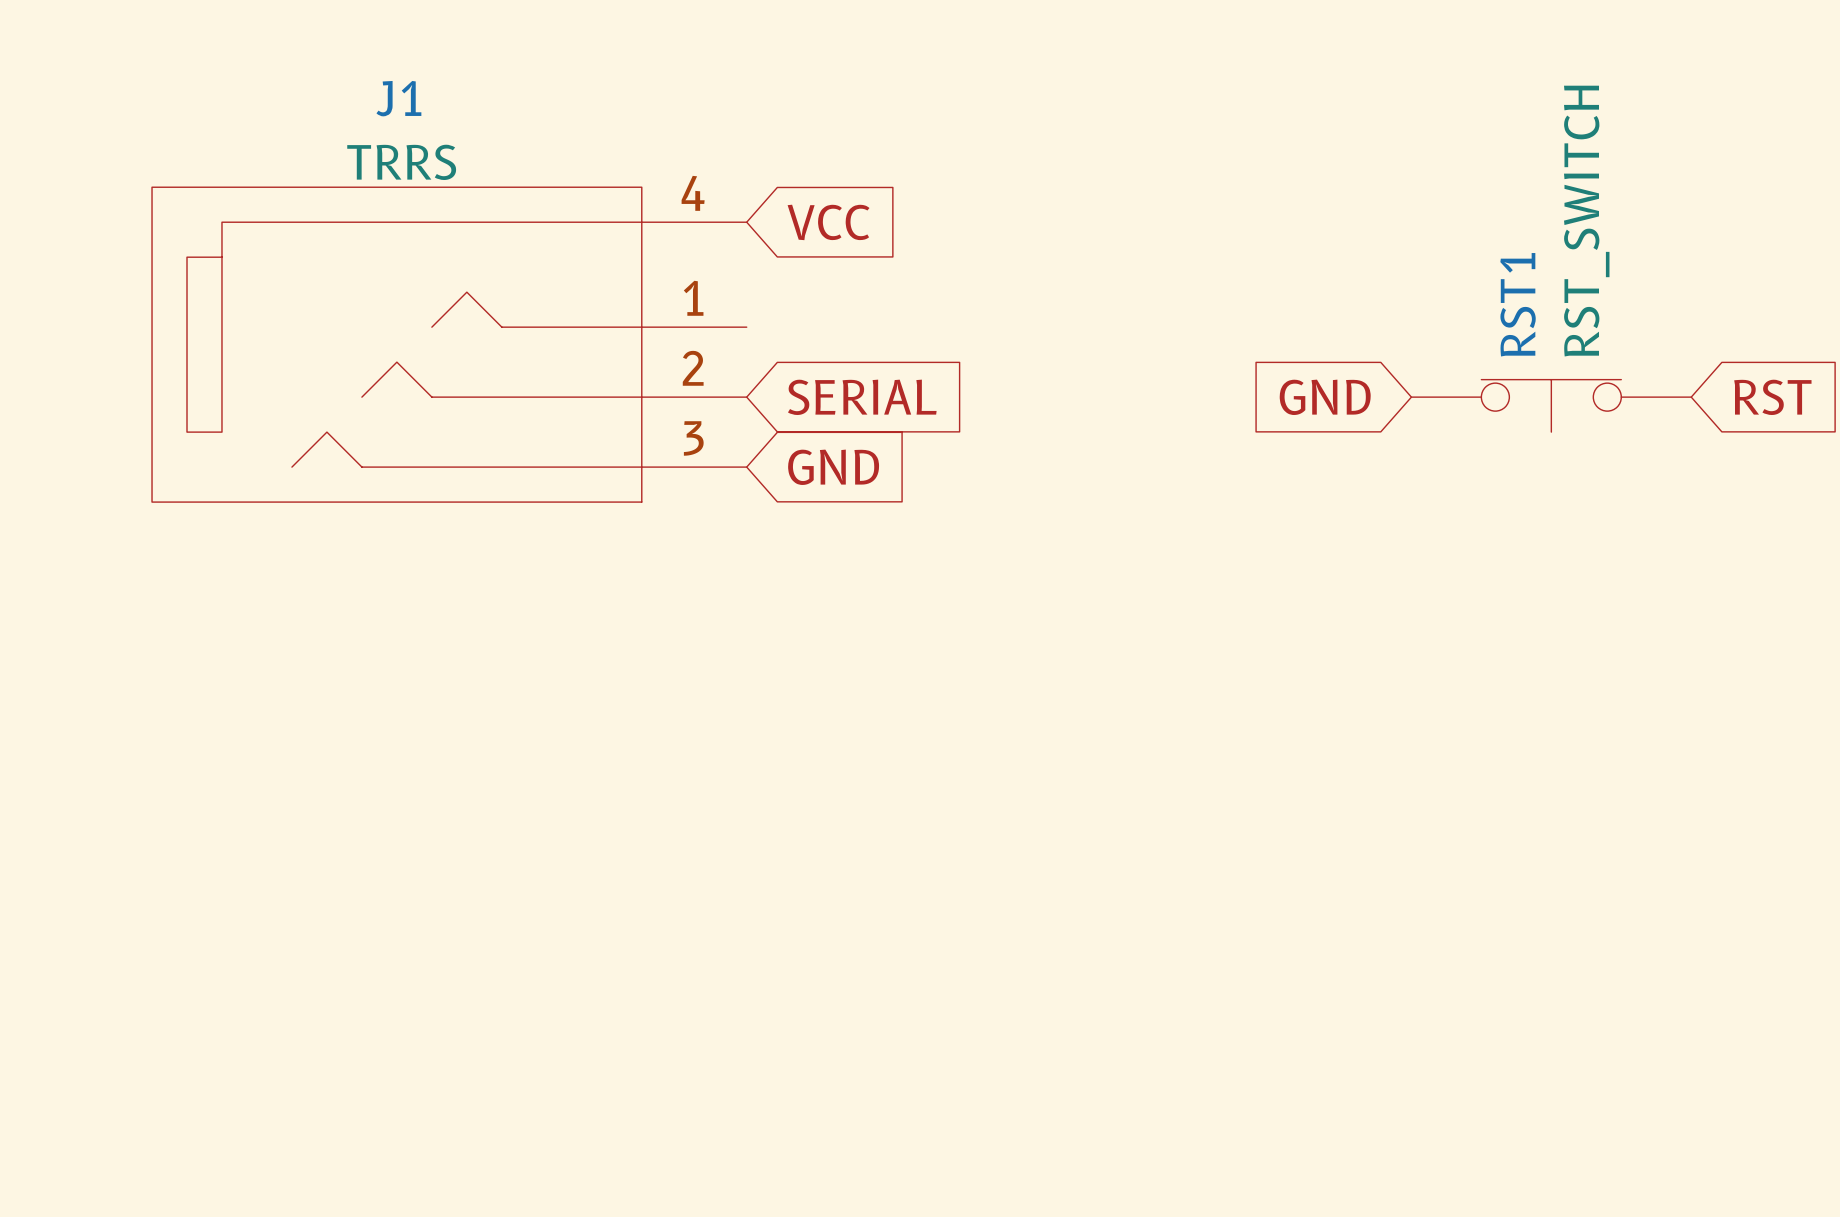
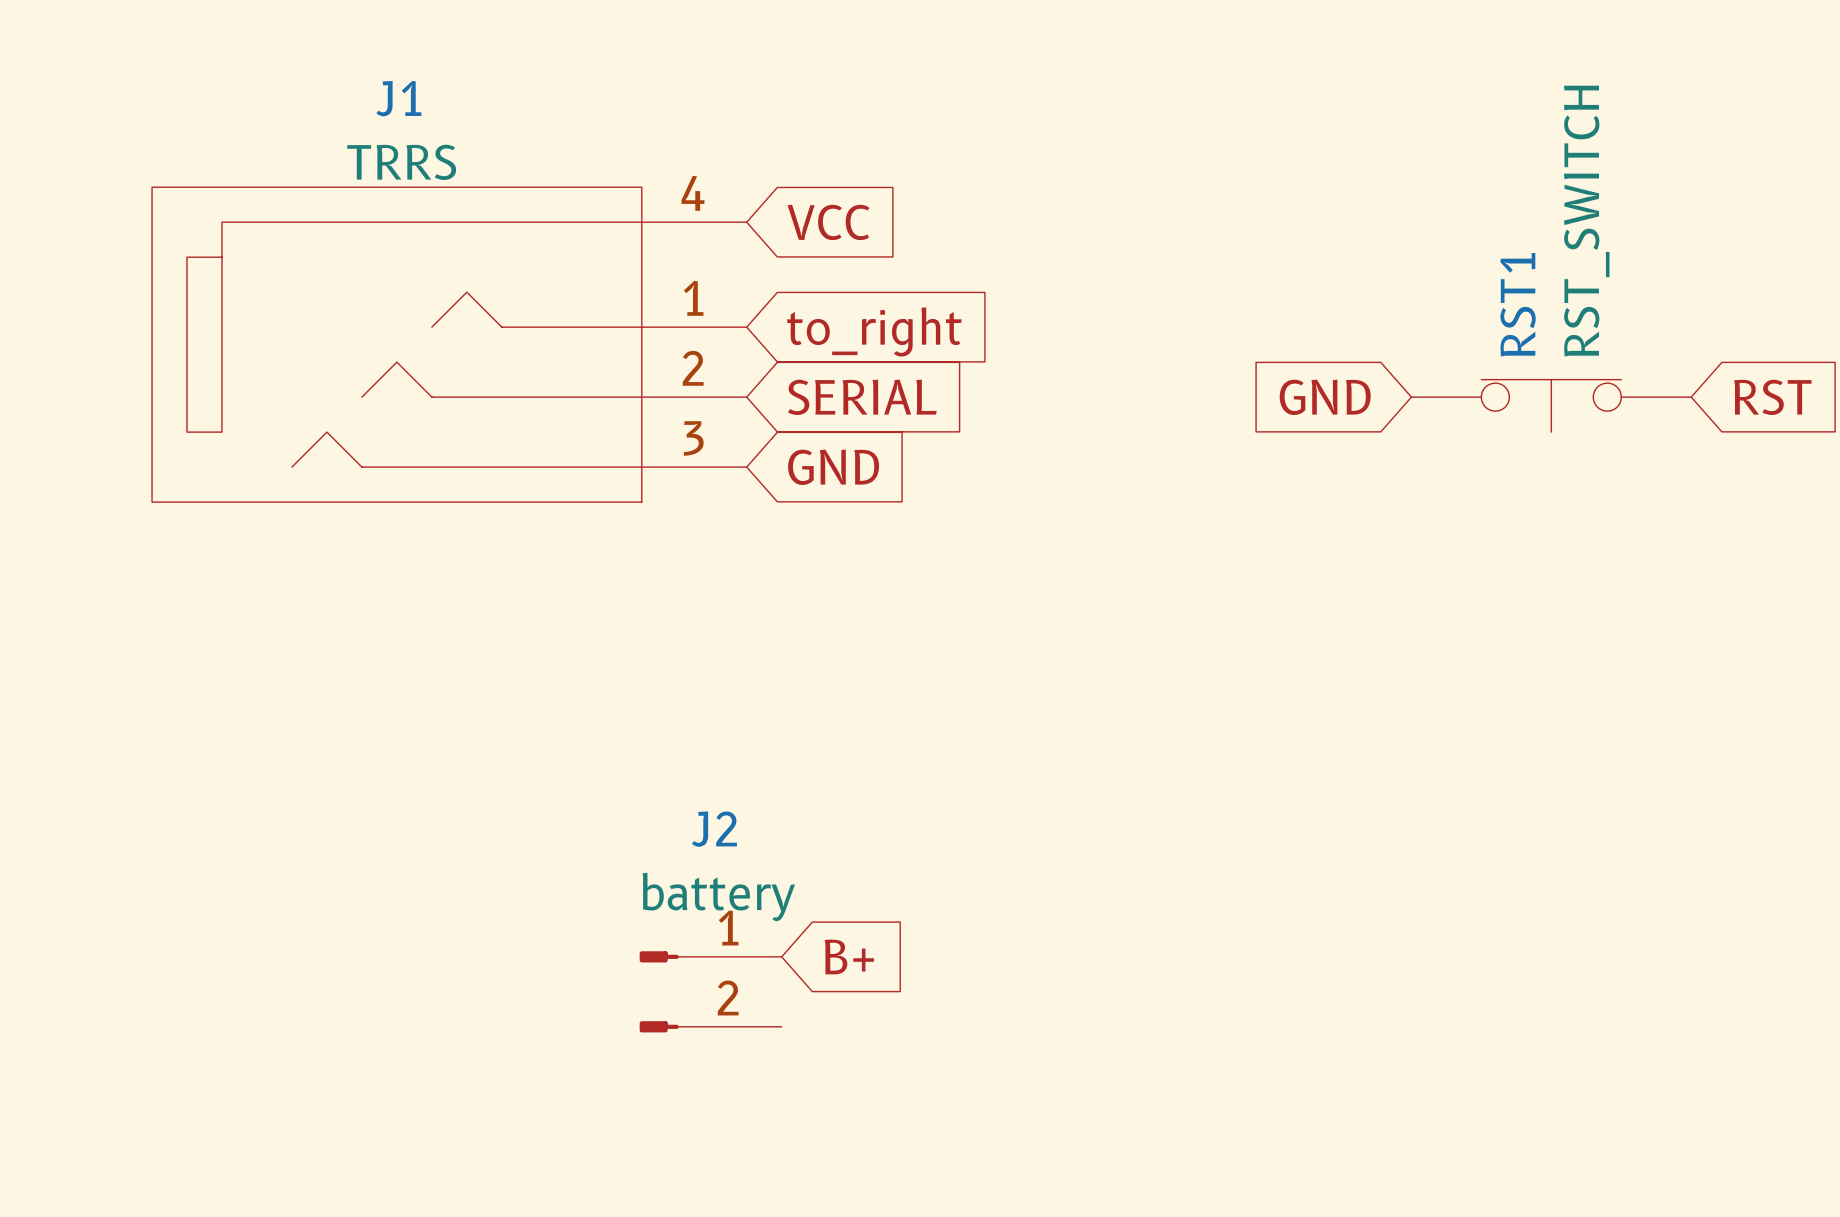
global label: none -> to_right (874, 331)
global label: none -> B+ (849, 956)
J2: none -> battery (710, 991)

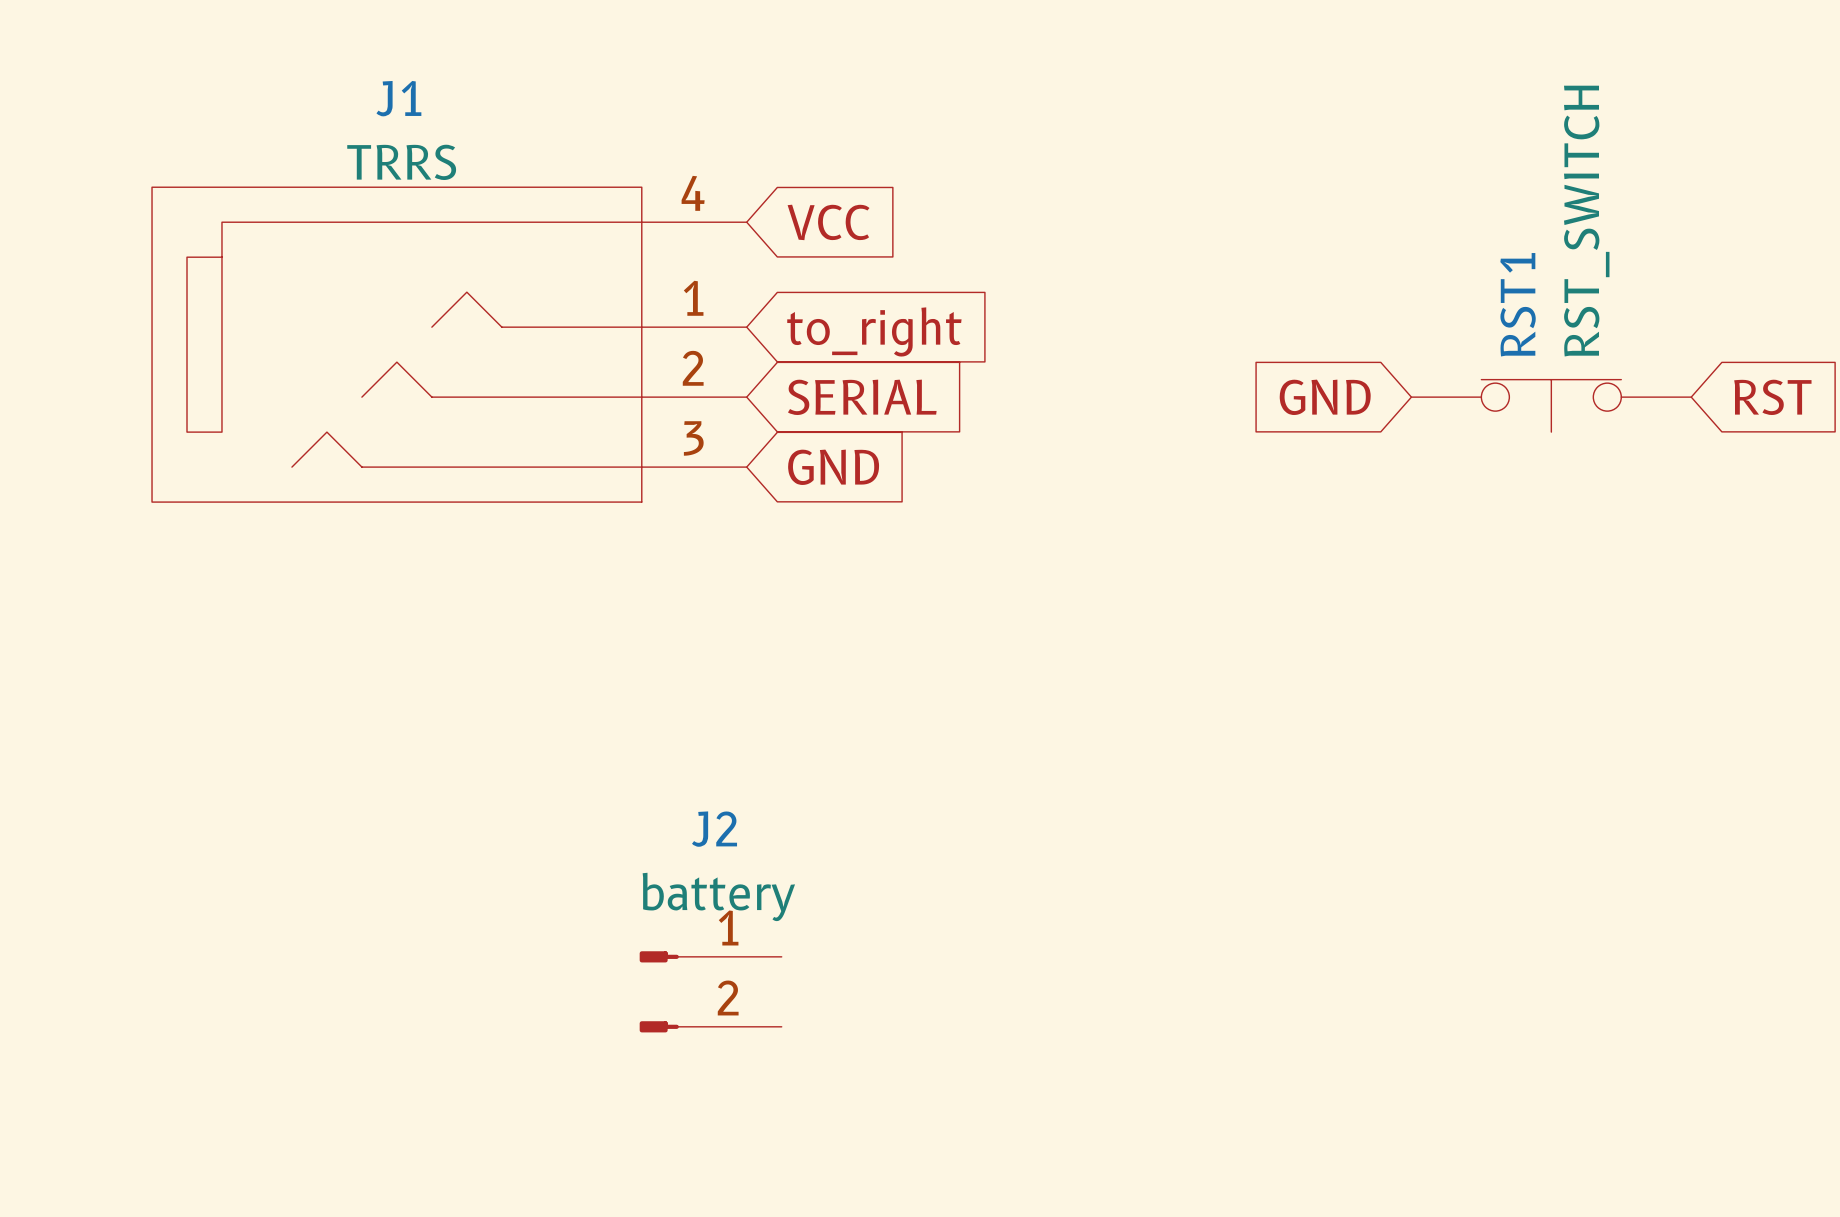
global label: B+ (849, 956) -> none

